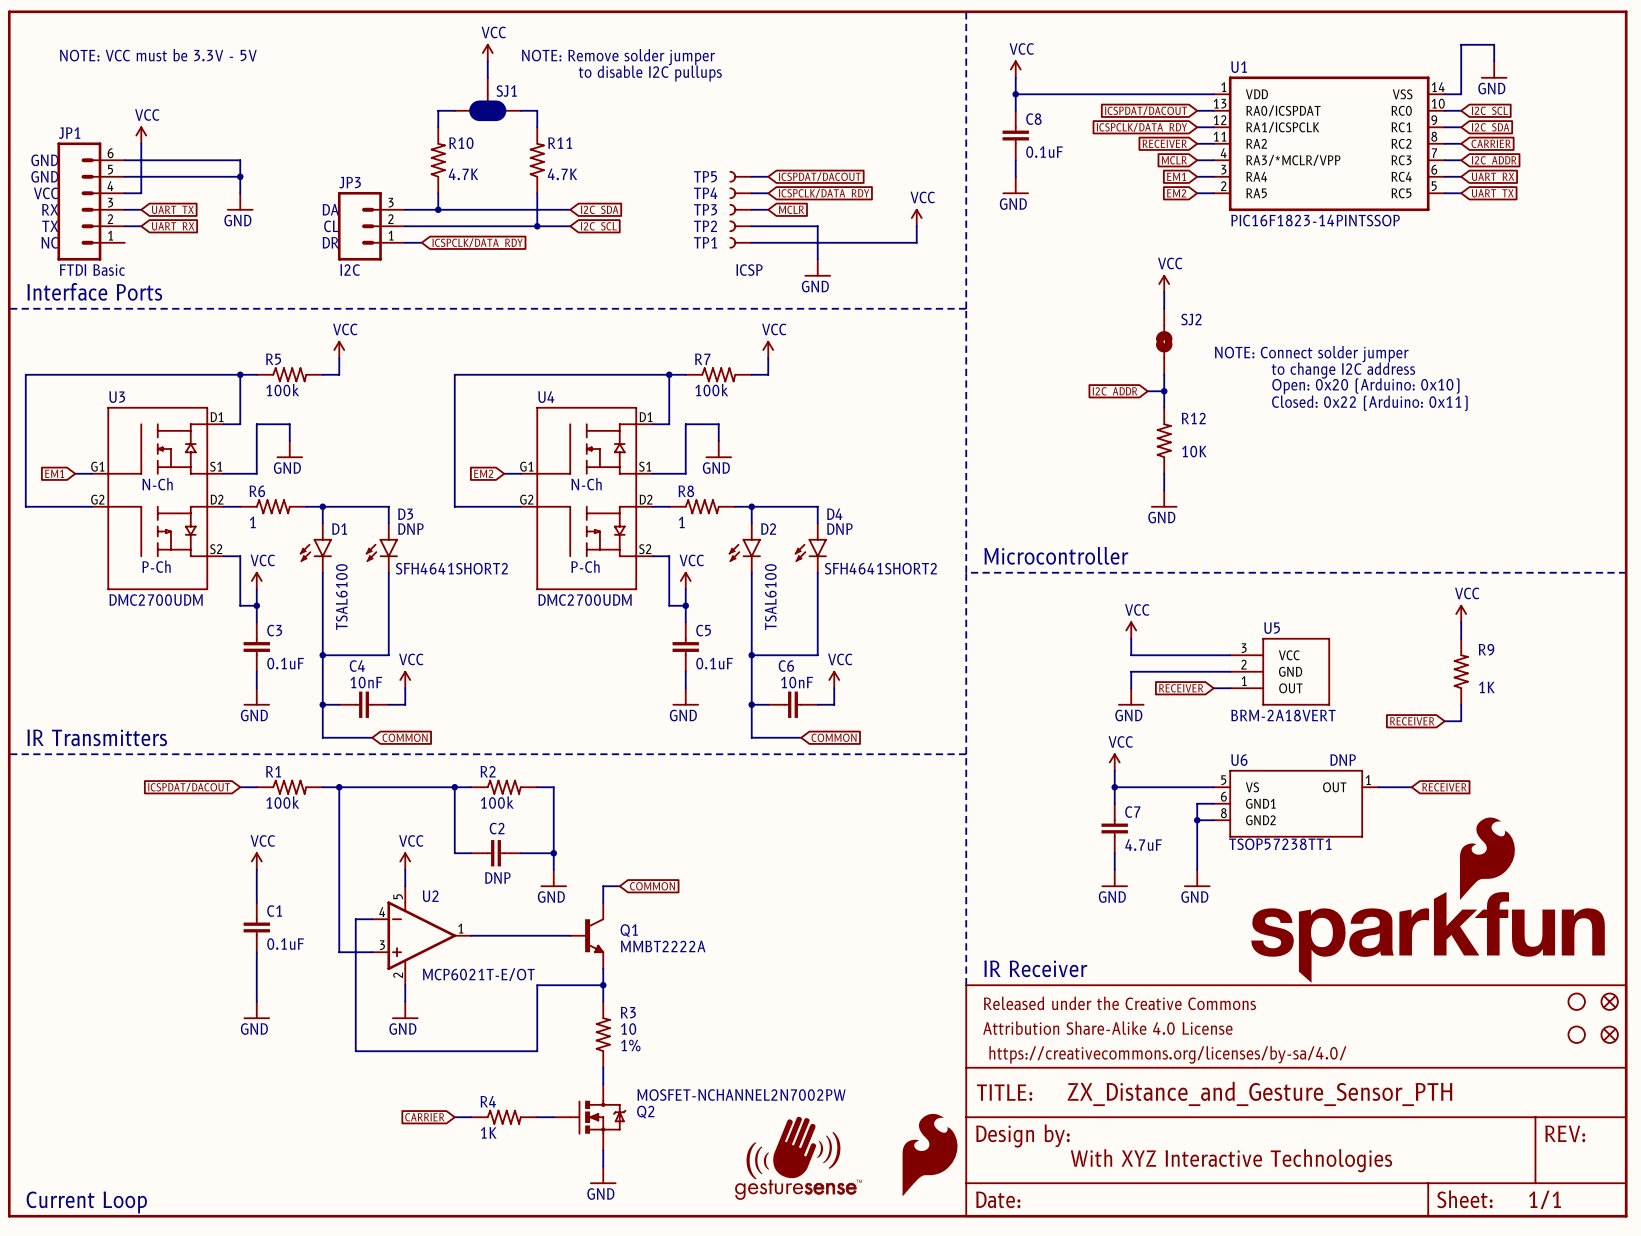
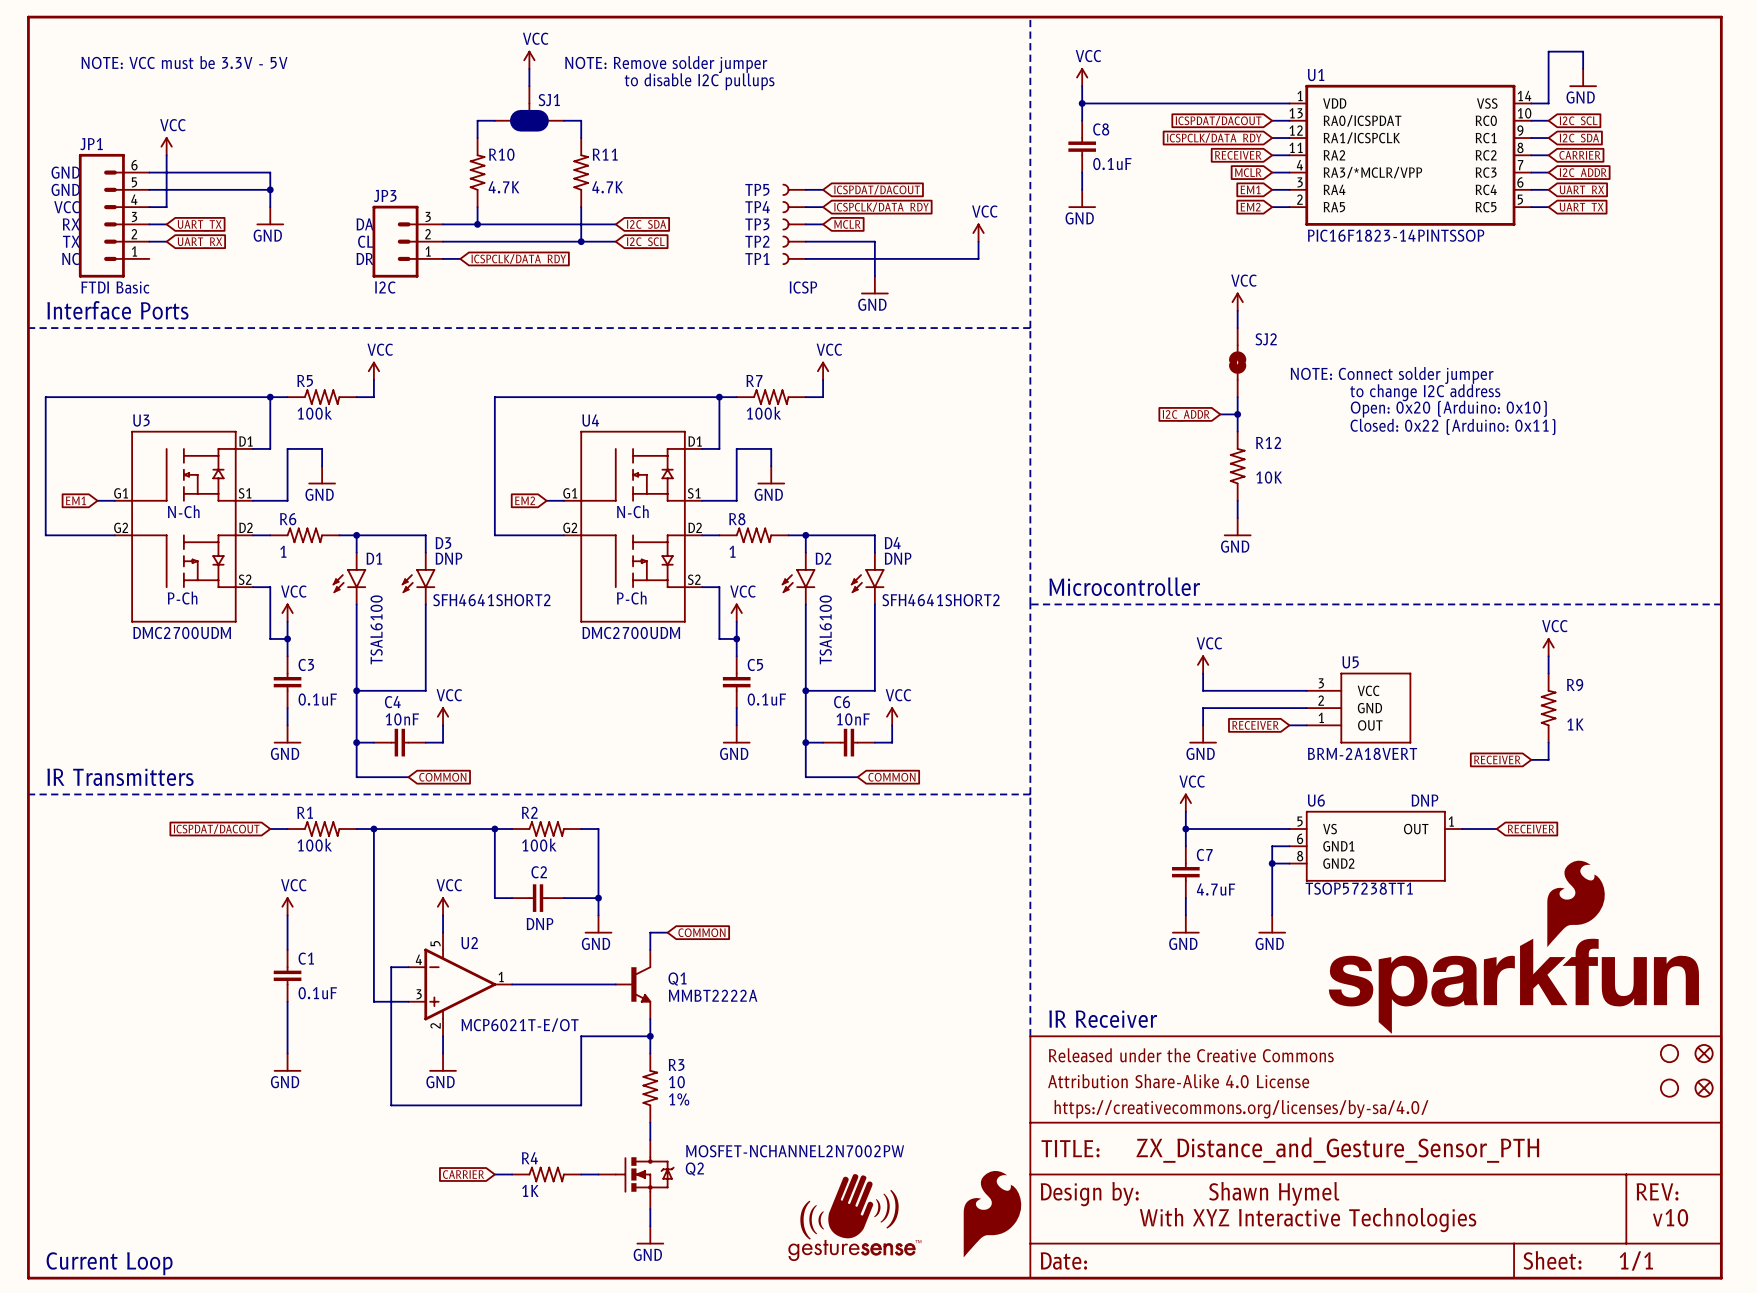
part text: none -> Shawn Hymel (1274, 1193)
part text: none -> v10 (1670, 1217)

